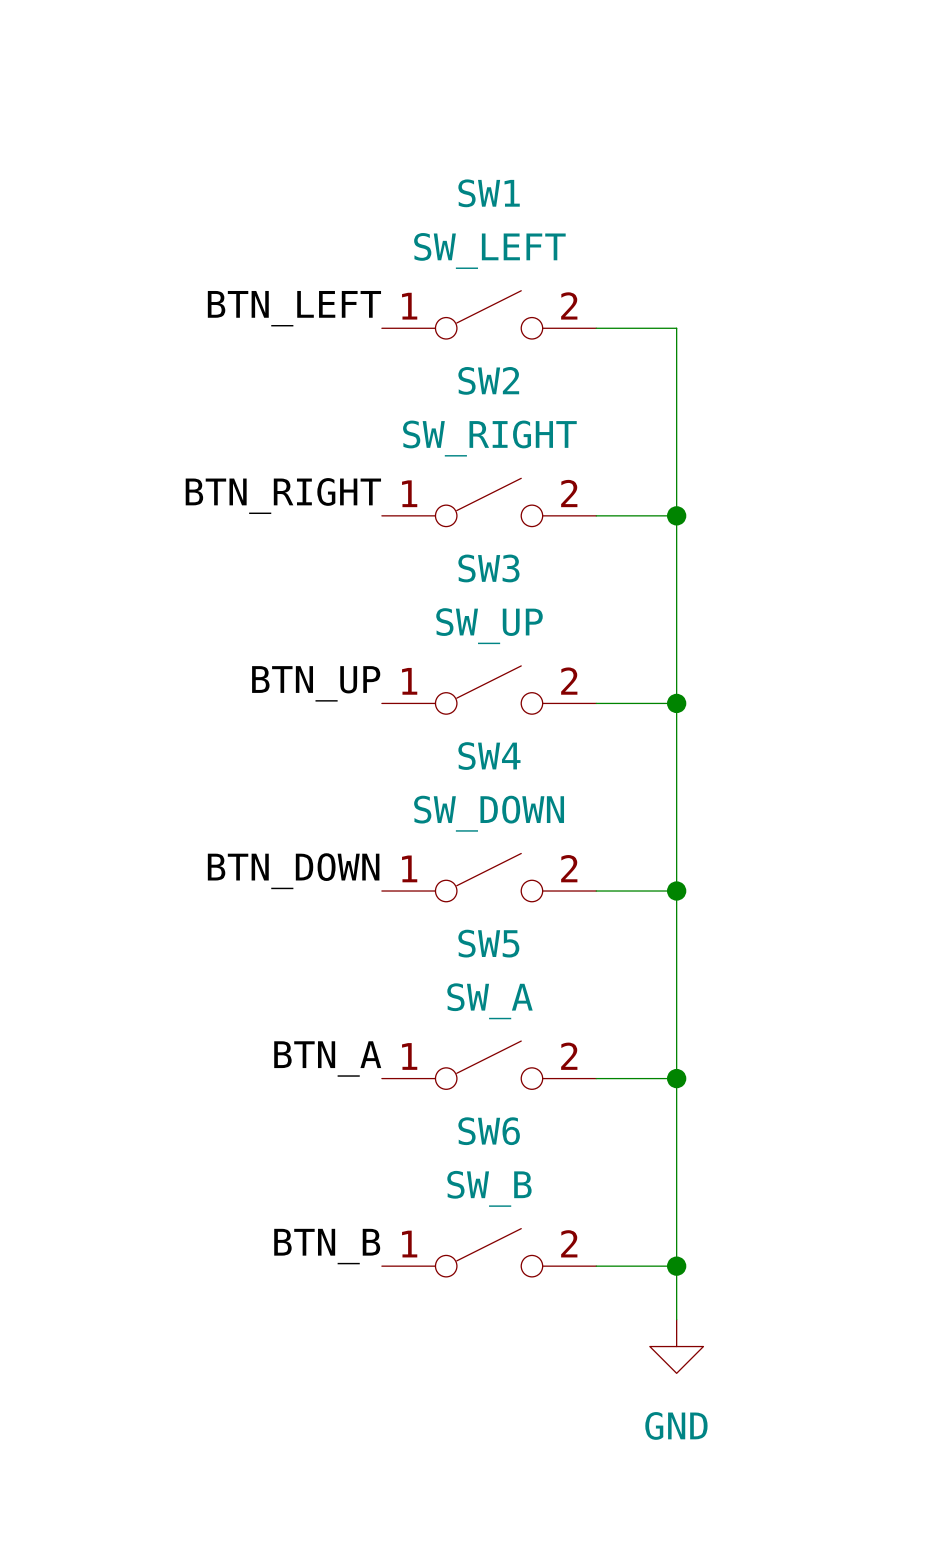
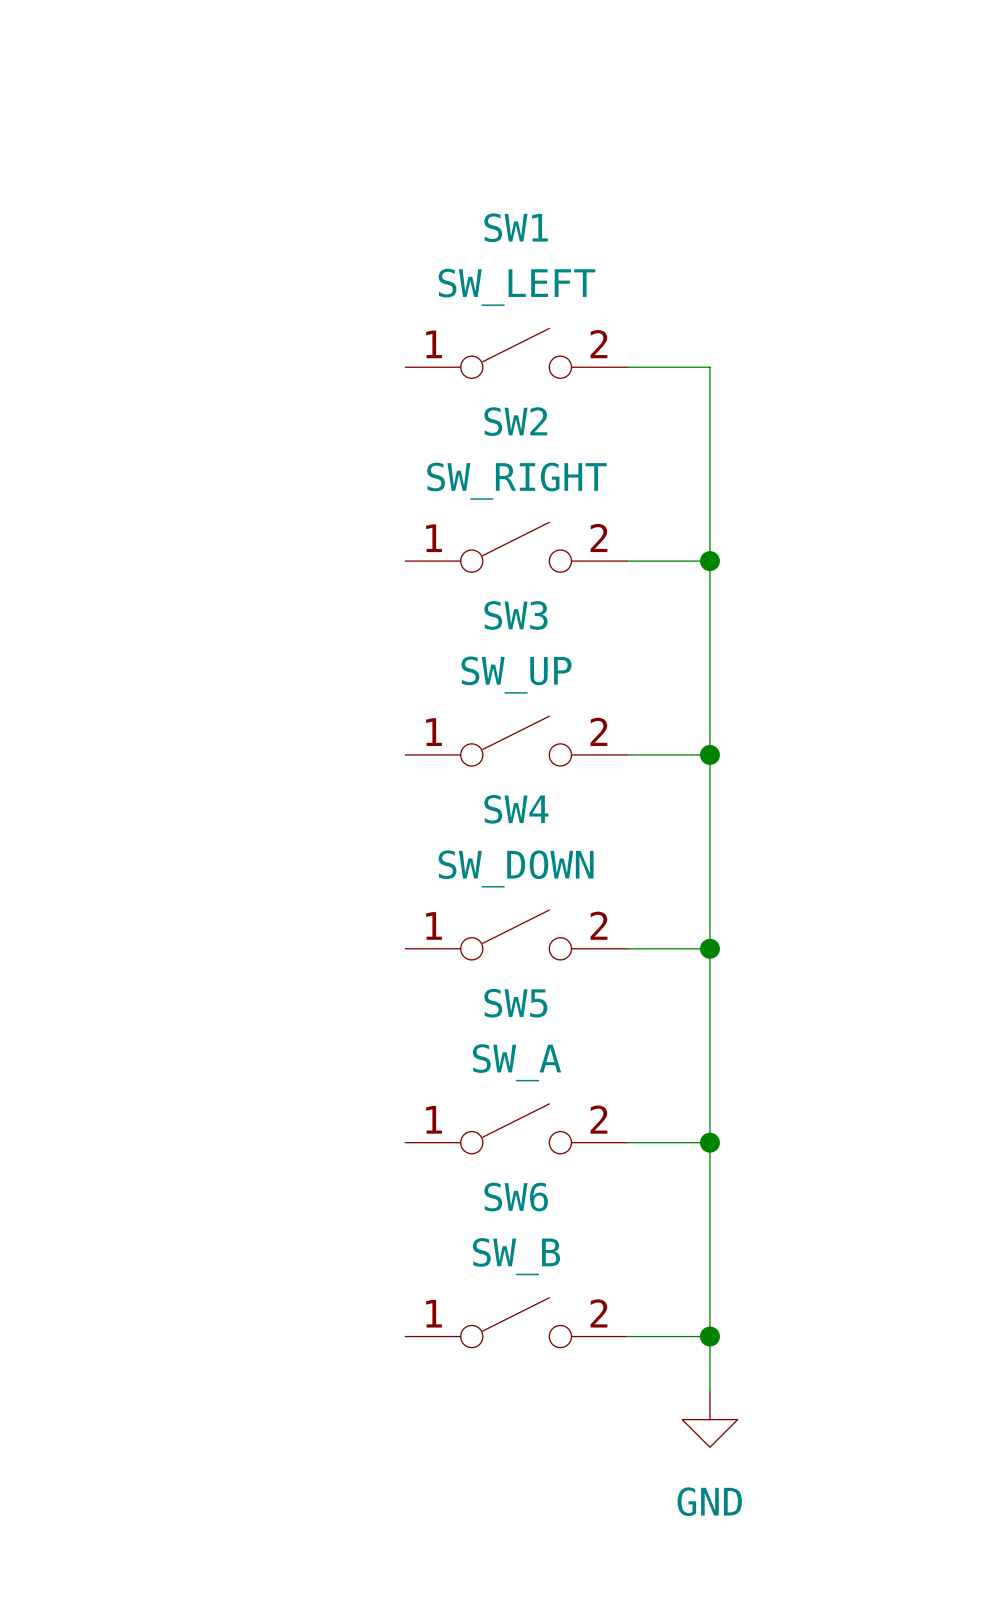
label: BTN_LEFT (294, 308) -> none
label: BTN_RIGHT (283, 496) -> none
label: BTN_UP (316, 683) -> none
label: BTN_DOWN (293, 871) -> none
label: BTN_A (327, 1059) -> none
label: BTN_B (327, 1246) -> none

